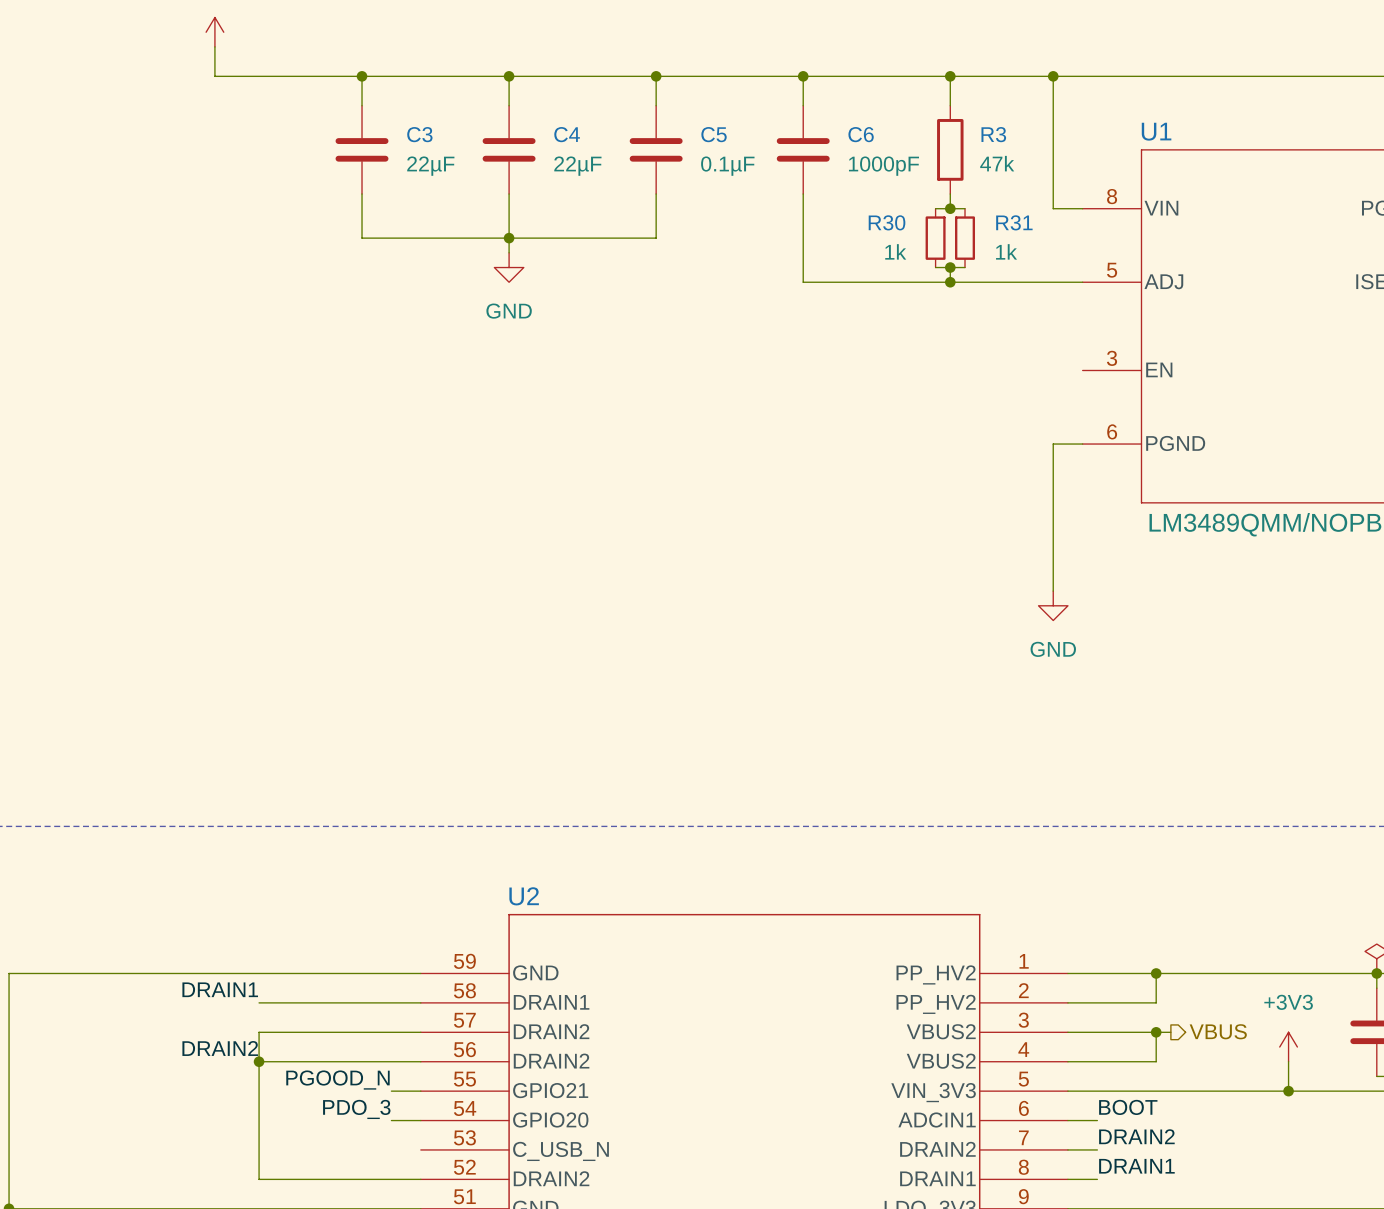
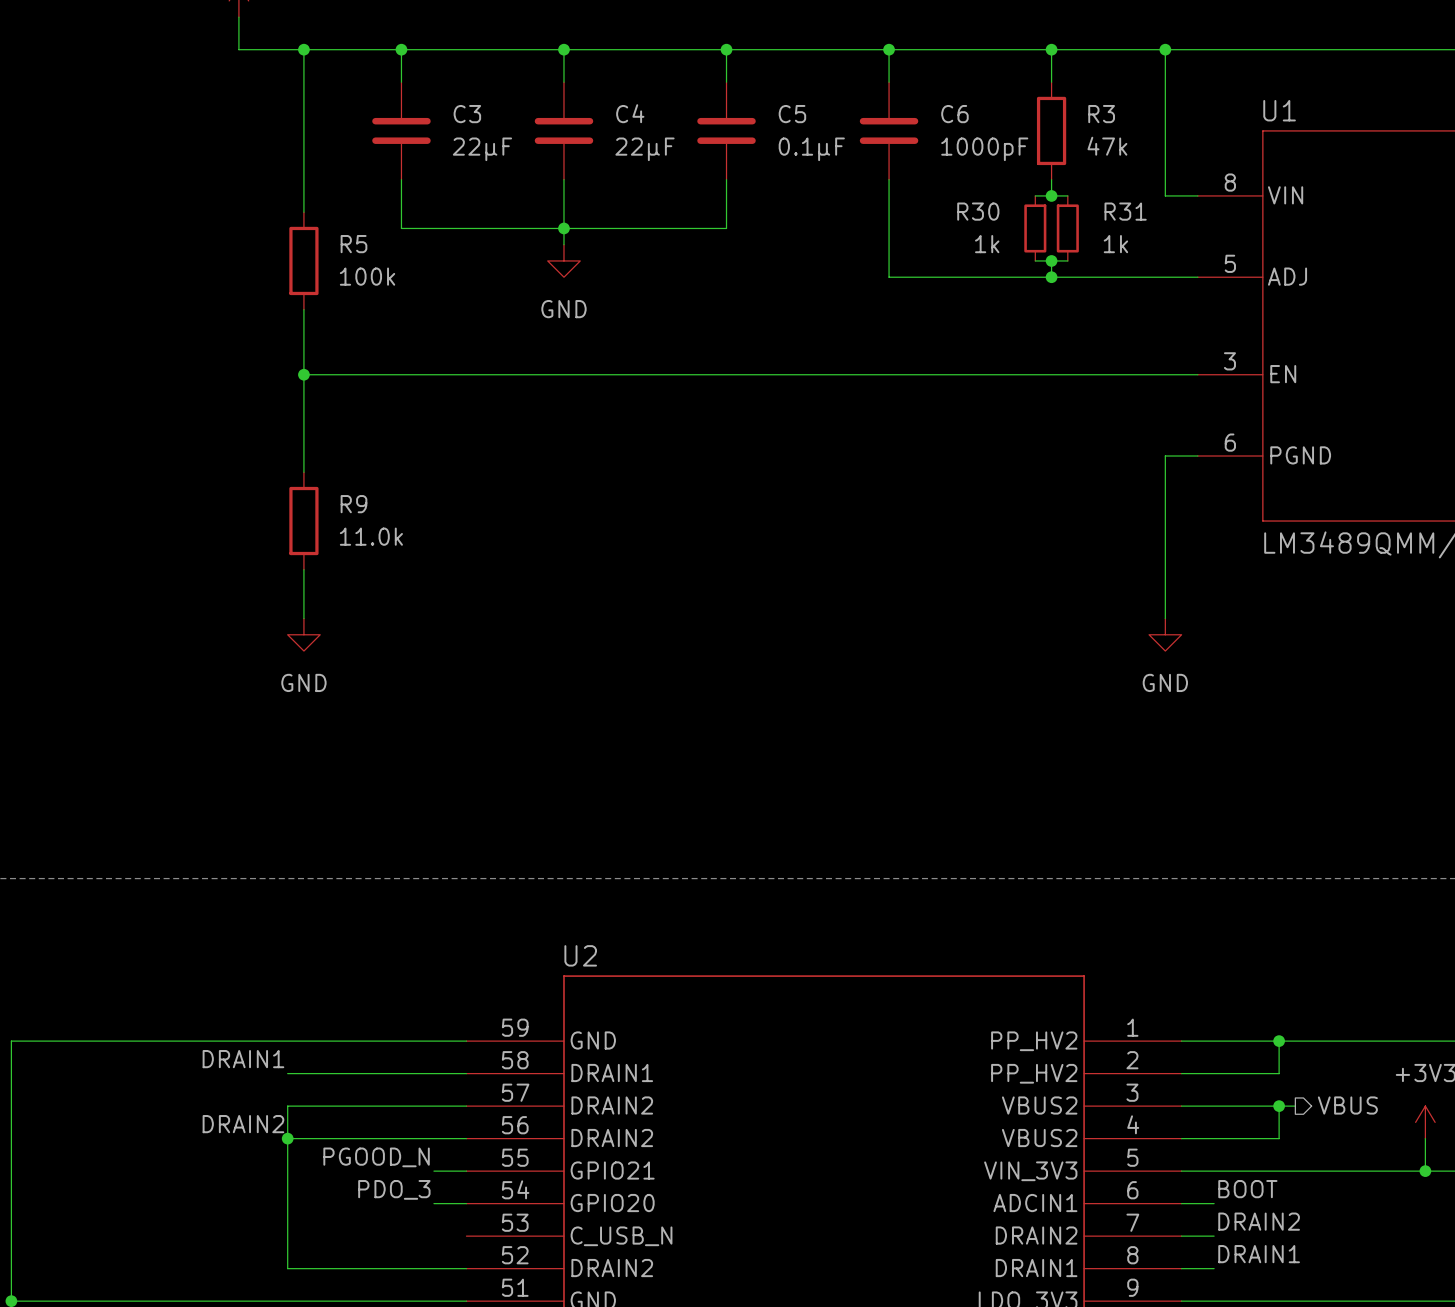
wire: none -> (303, 49) (303, 212)
junction: none -> (303, 49)
R5: none -> 100k (303, 260)
wire: none -> (303, 309) (303, 472)
wire: none -> (303, 374) (1197, 374)
junction: none -> (303, 374)
R9: none -> 11.0k (303, 521)
wire: none -> (303, 569) (303, 618)
power symbol: none -> GND (303, 634)

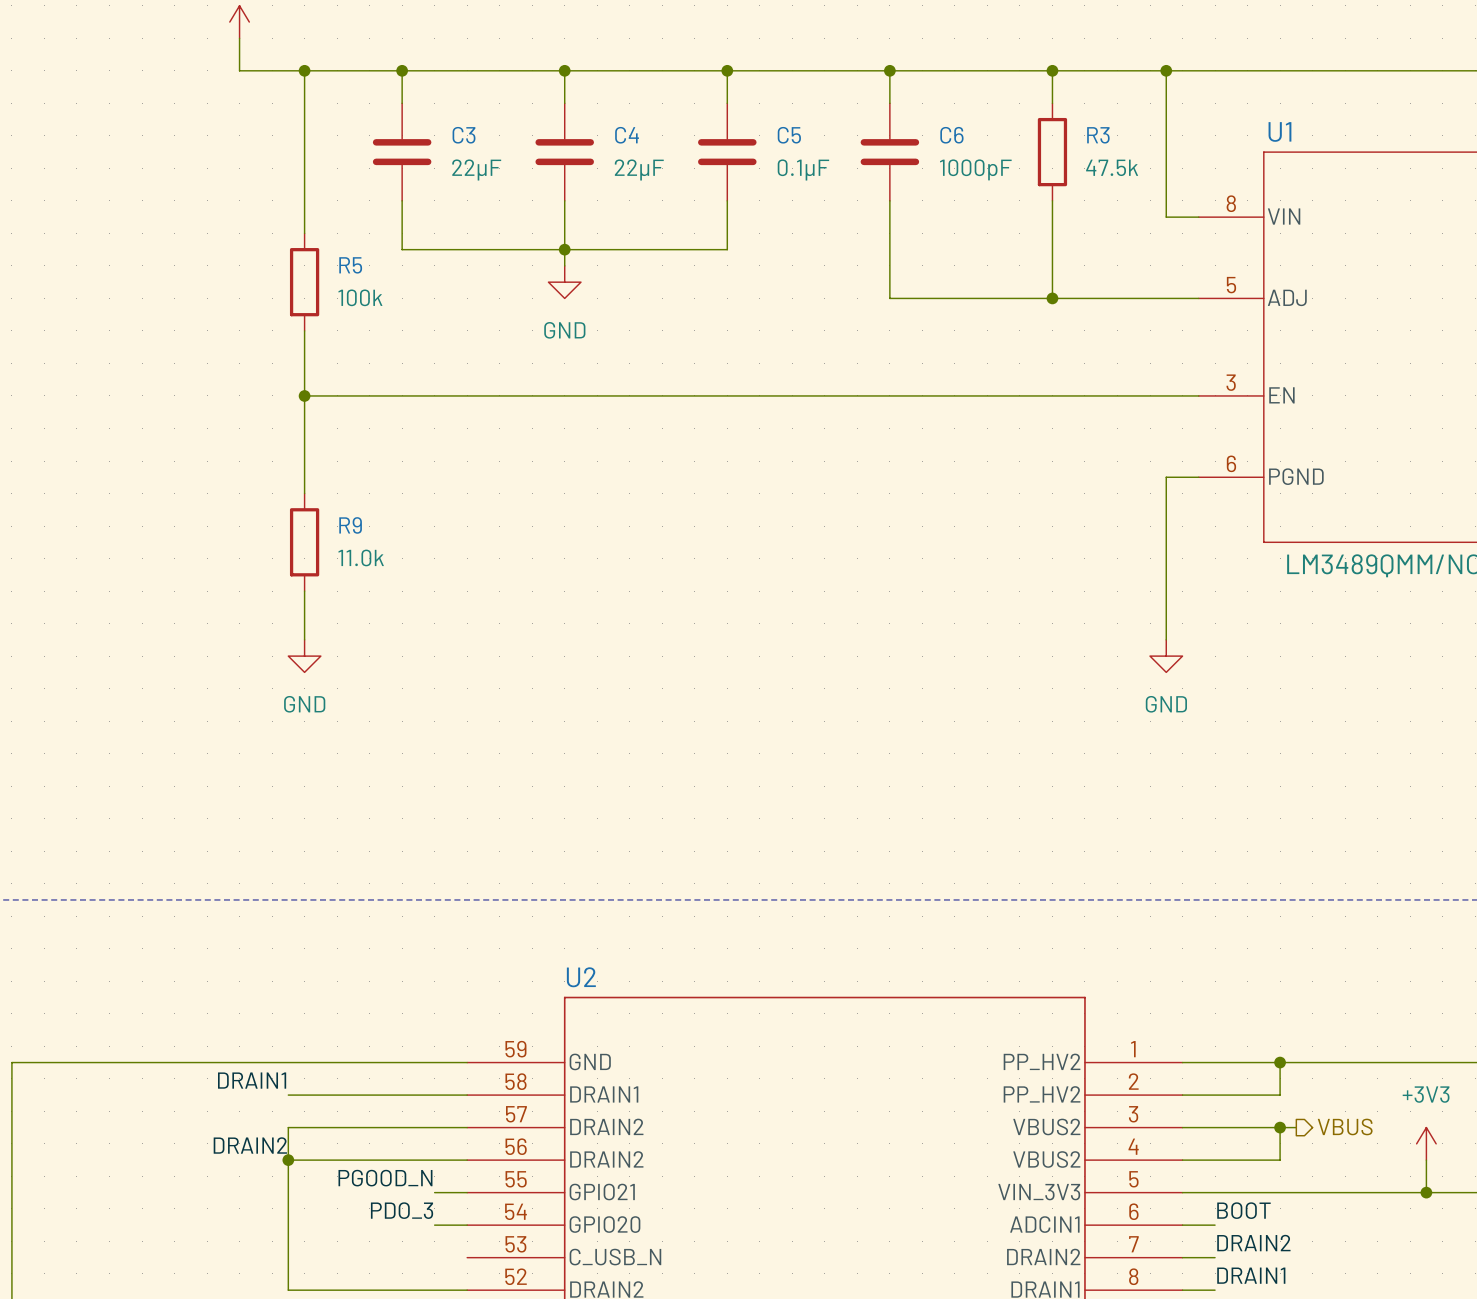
R3 value: 47k (1107, 146) -> 47.5k (1112, 167)
wire: (1035, 195) (1067, 195) -> none
wire: none -> (1052, 217) (1052, 282)
junction: (1051, 195) -> none
R30: 1k (1035, 228) -> none
R31: 1k (1067, 228) -> none
wire: (1035, 260) (1067, 260) -> none
junction: (1051, 260) -> none

